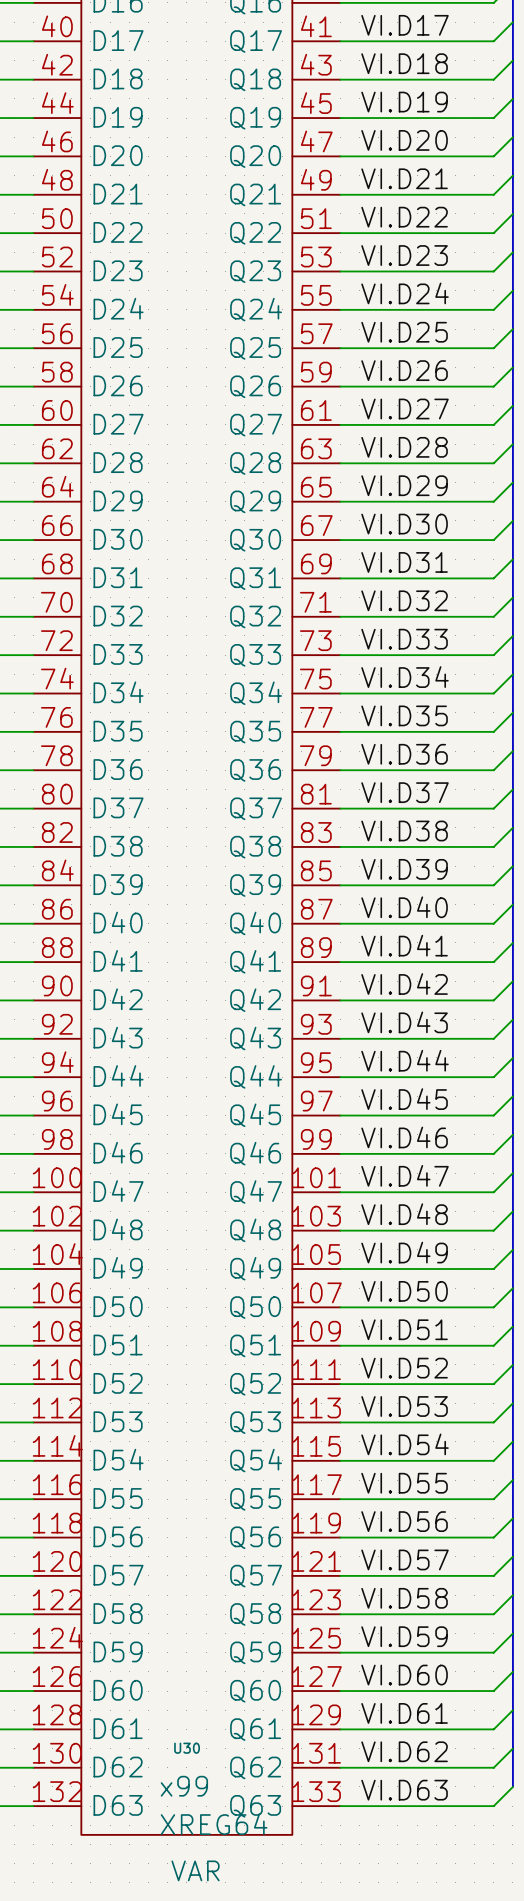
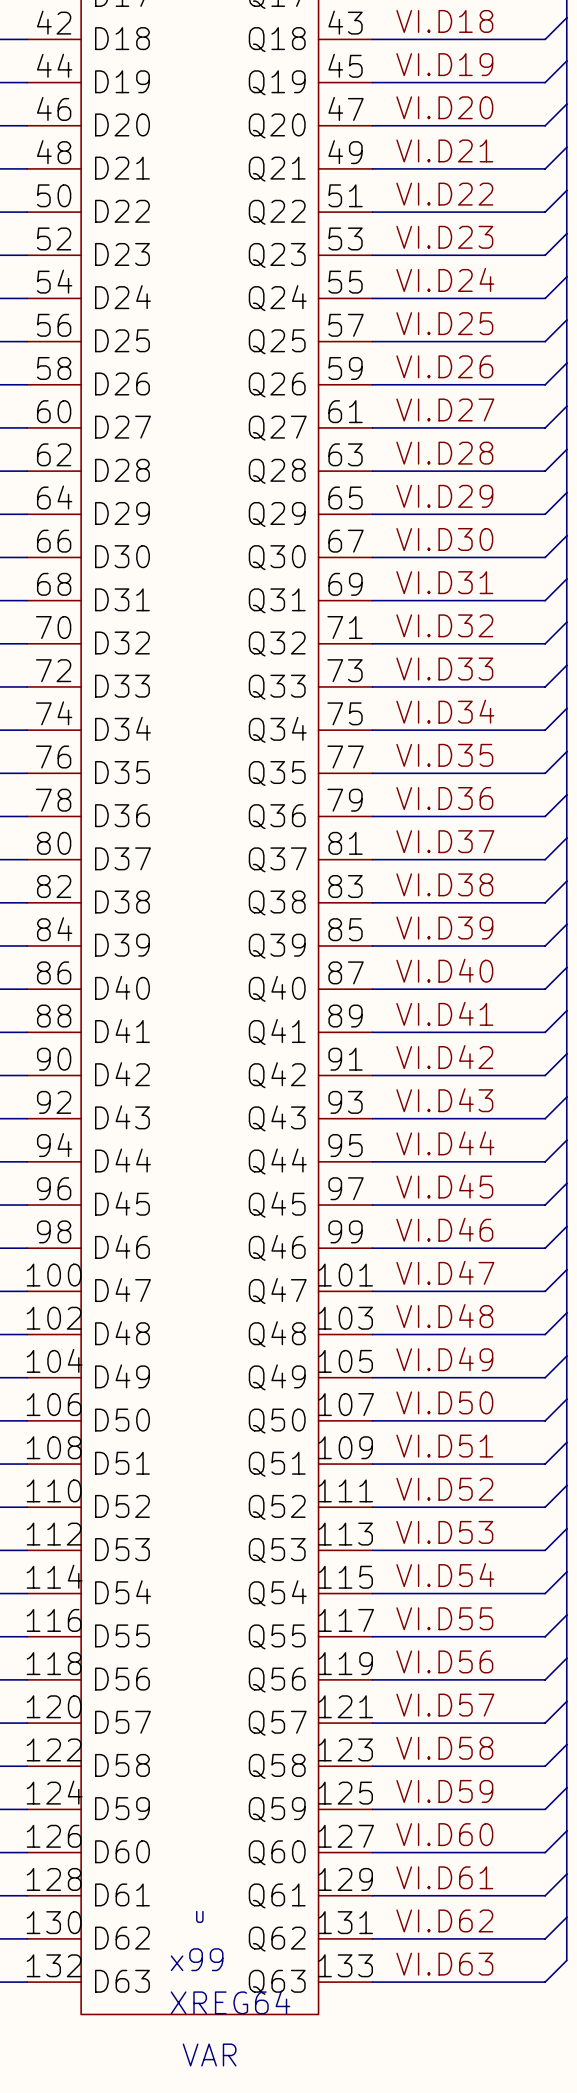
U30 name: U30 (187, 1748) -> U (199, 1916)

